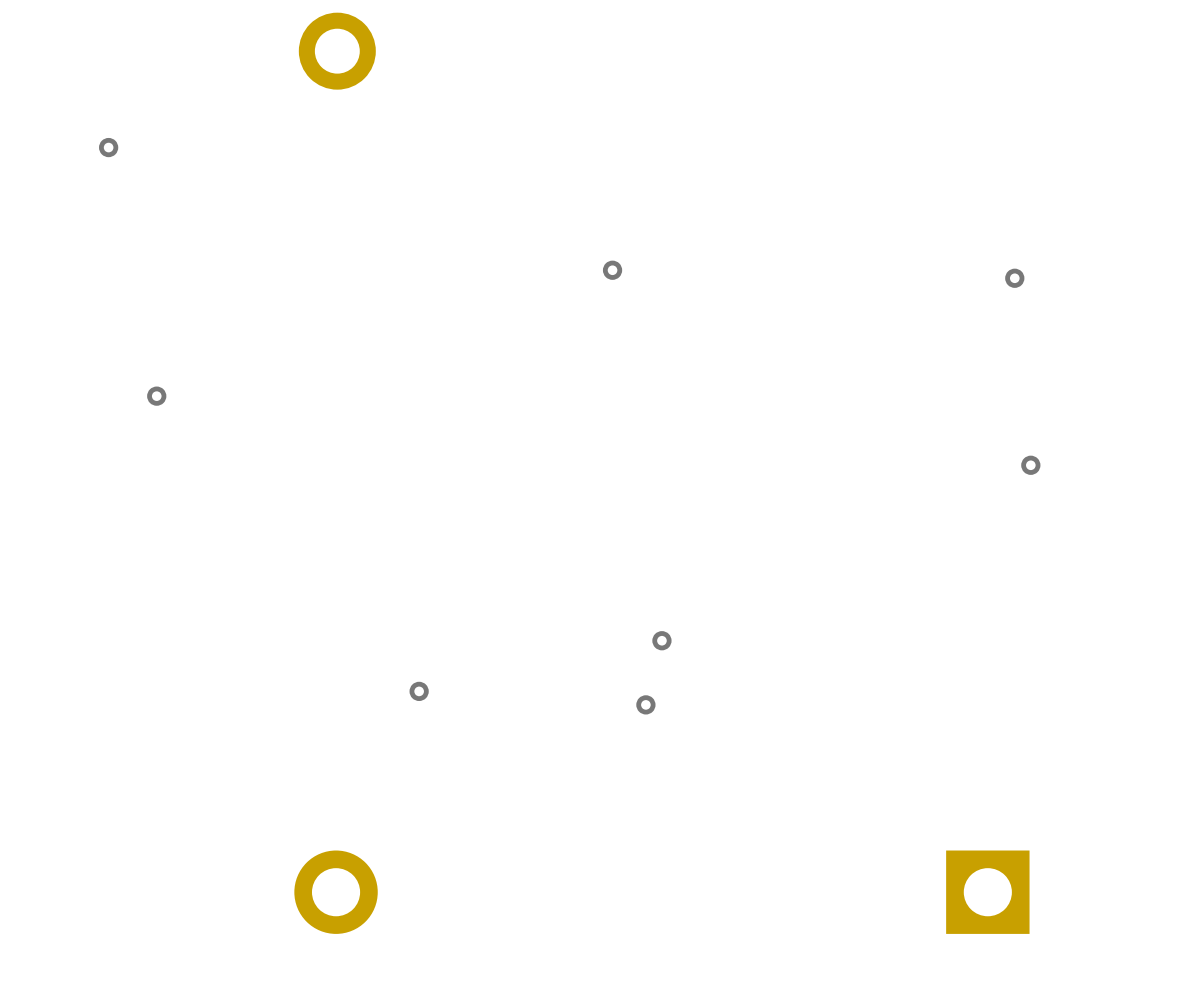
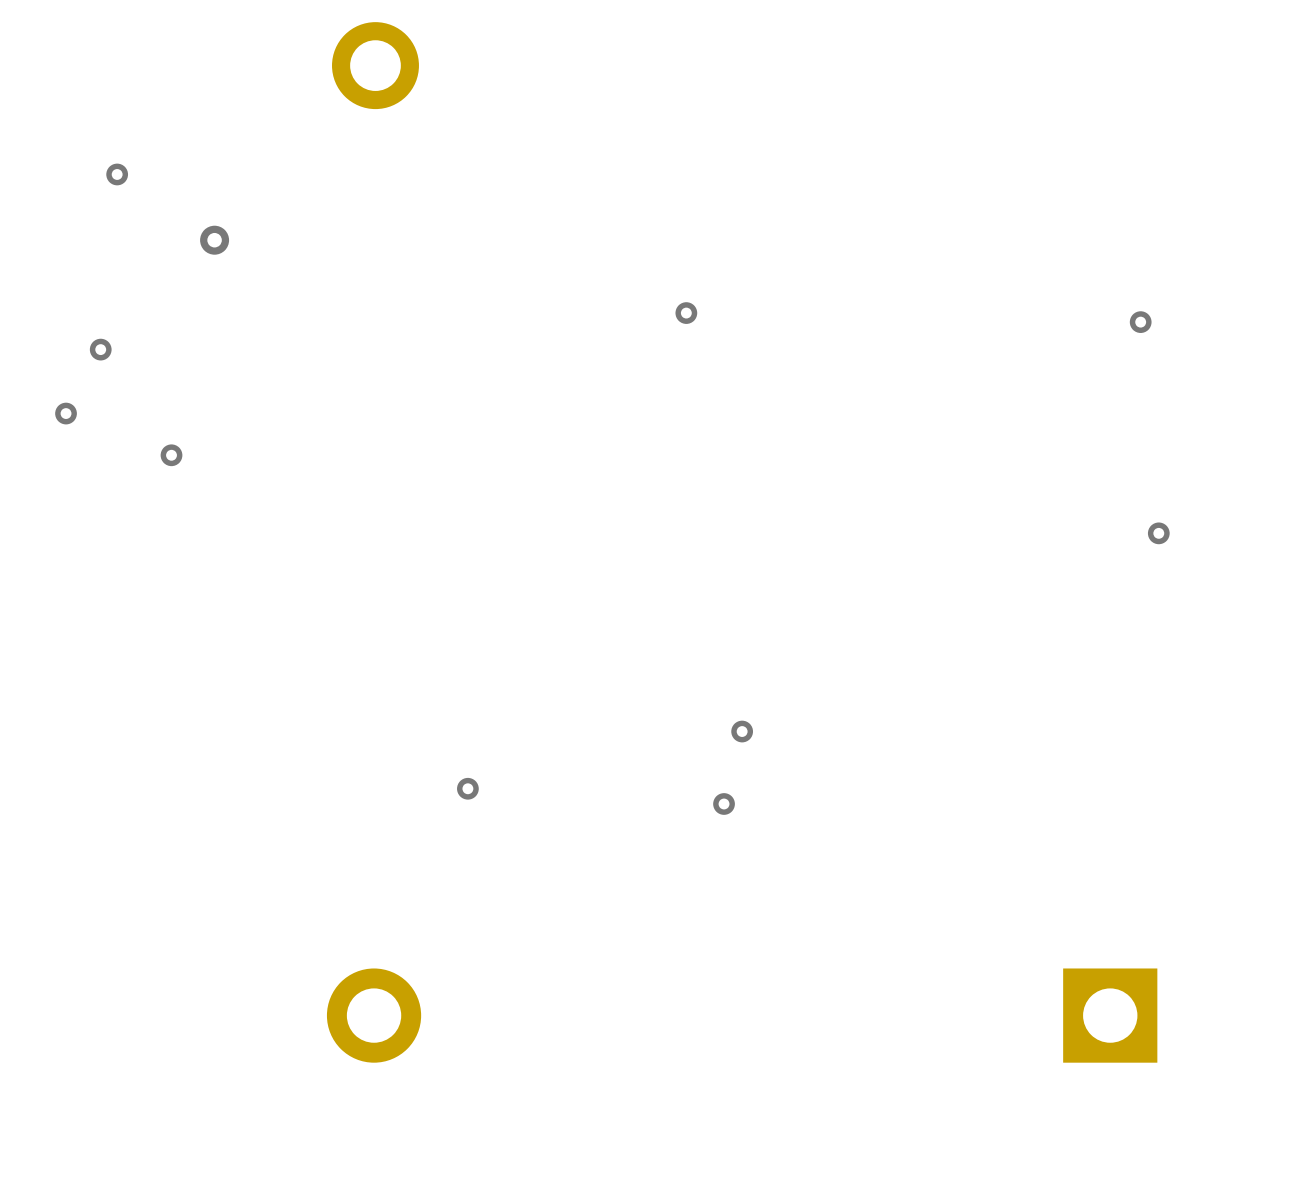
via: none -> (214, 240)
via: none -> (100, 349)
via: none -> (66, 413)

